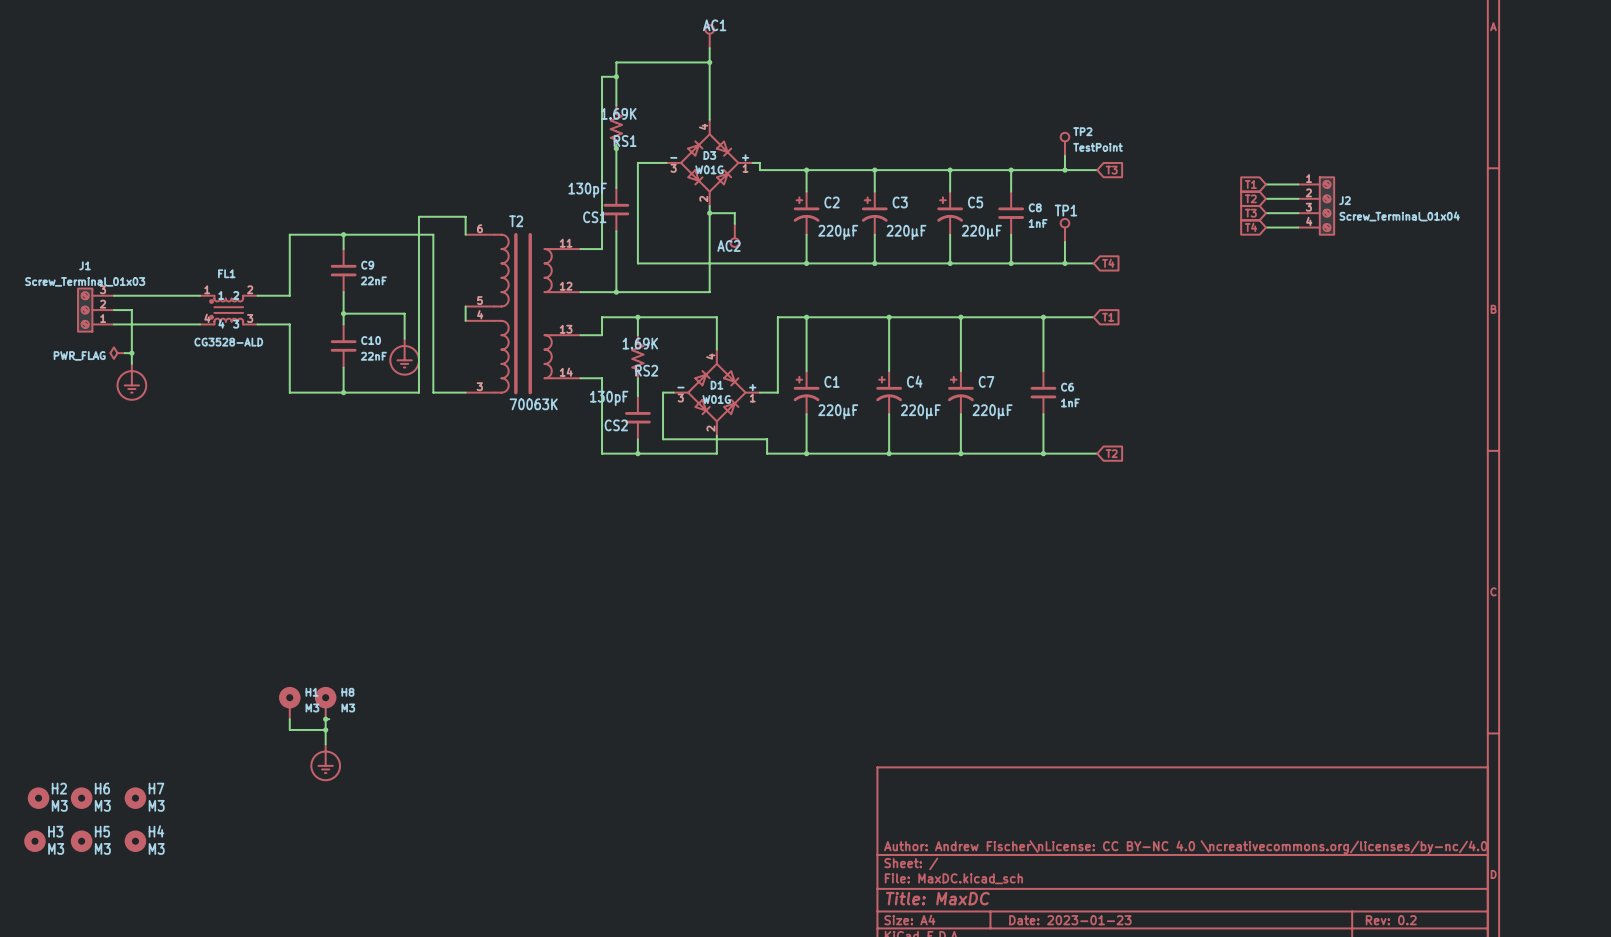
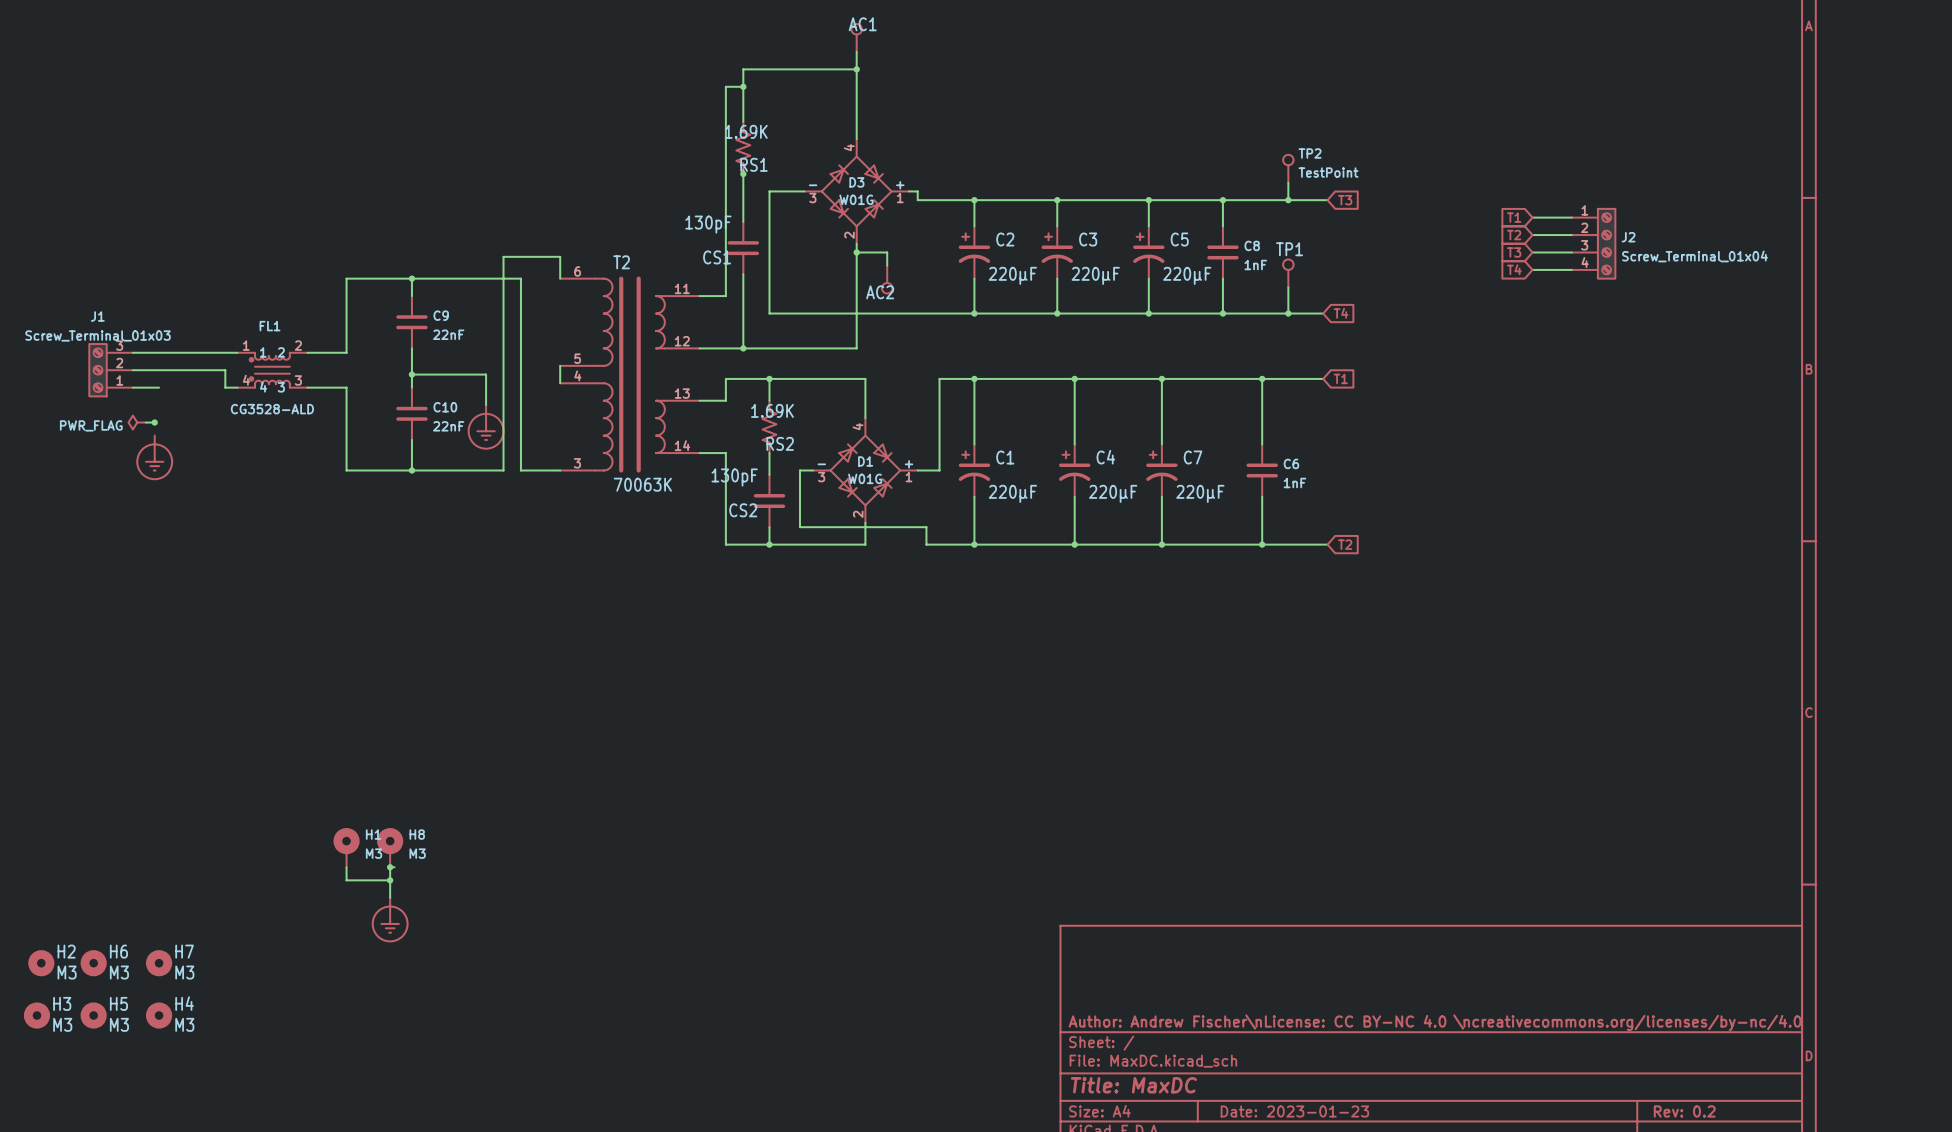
wire: (131, 310) (131, 363) -> none
wire: (135, 324) (190, 324) -> (154, 370) (225, 370) (225, 387)

